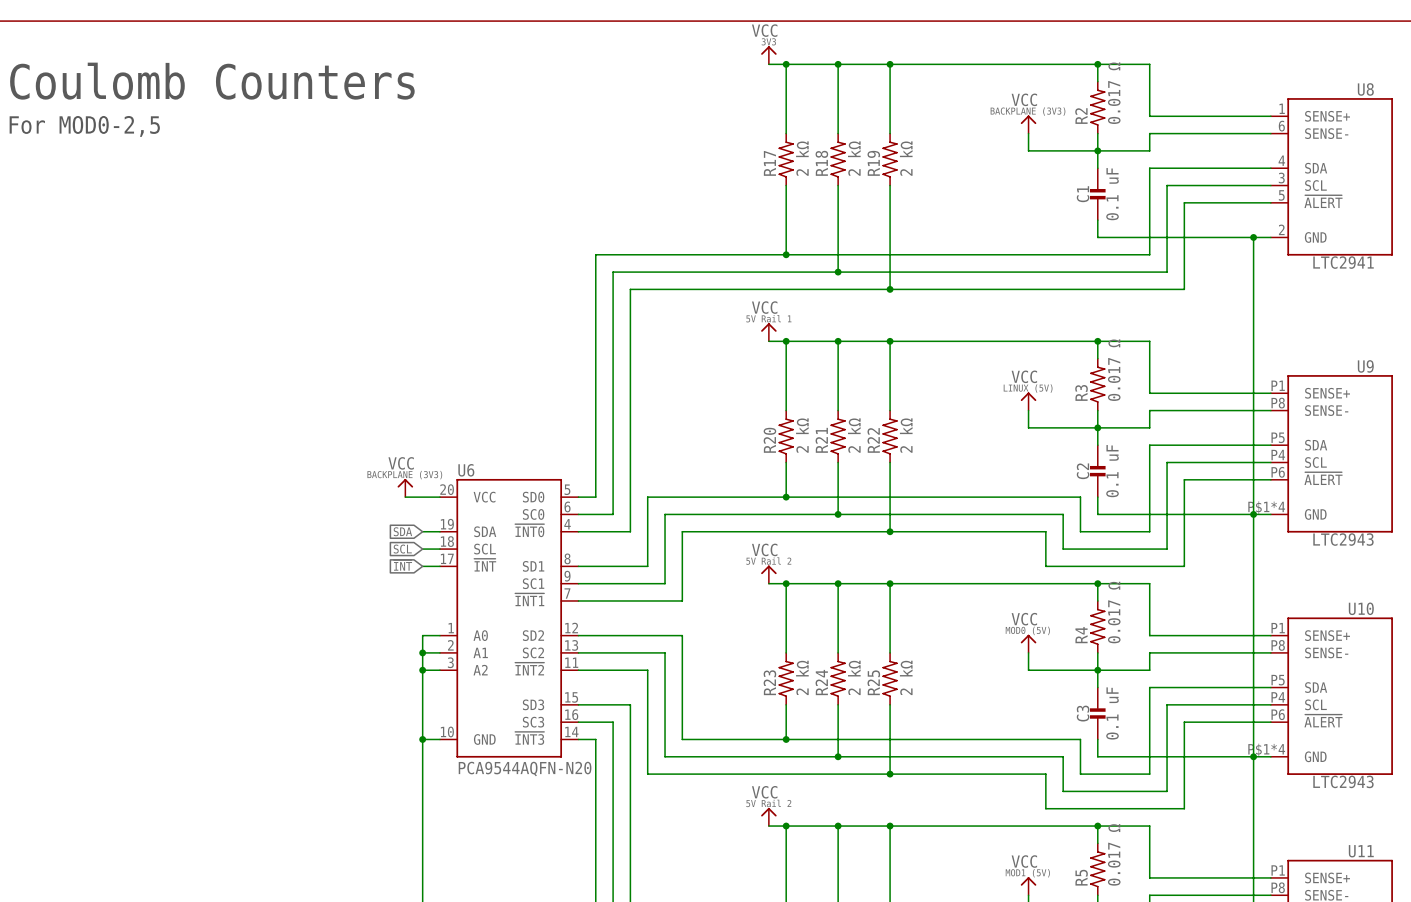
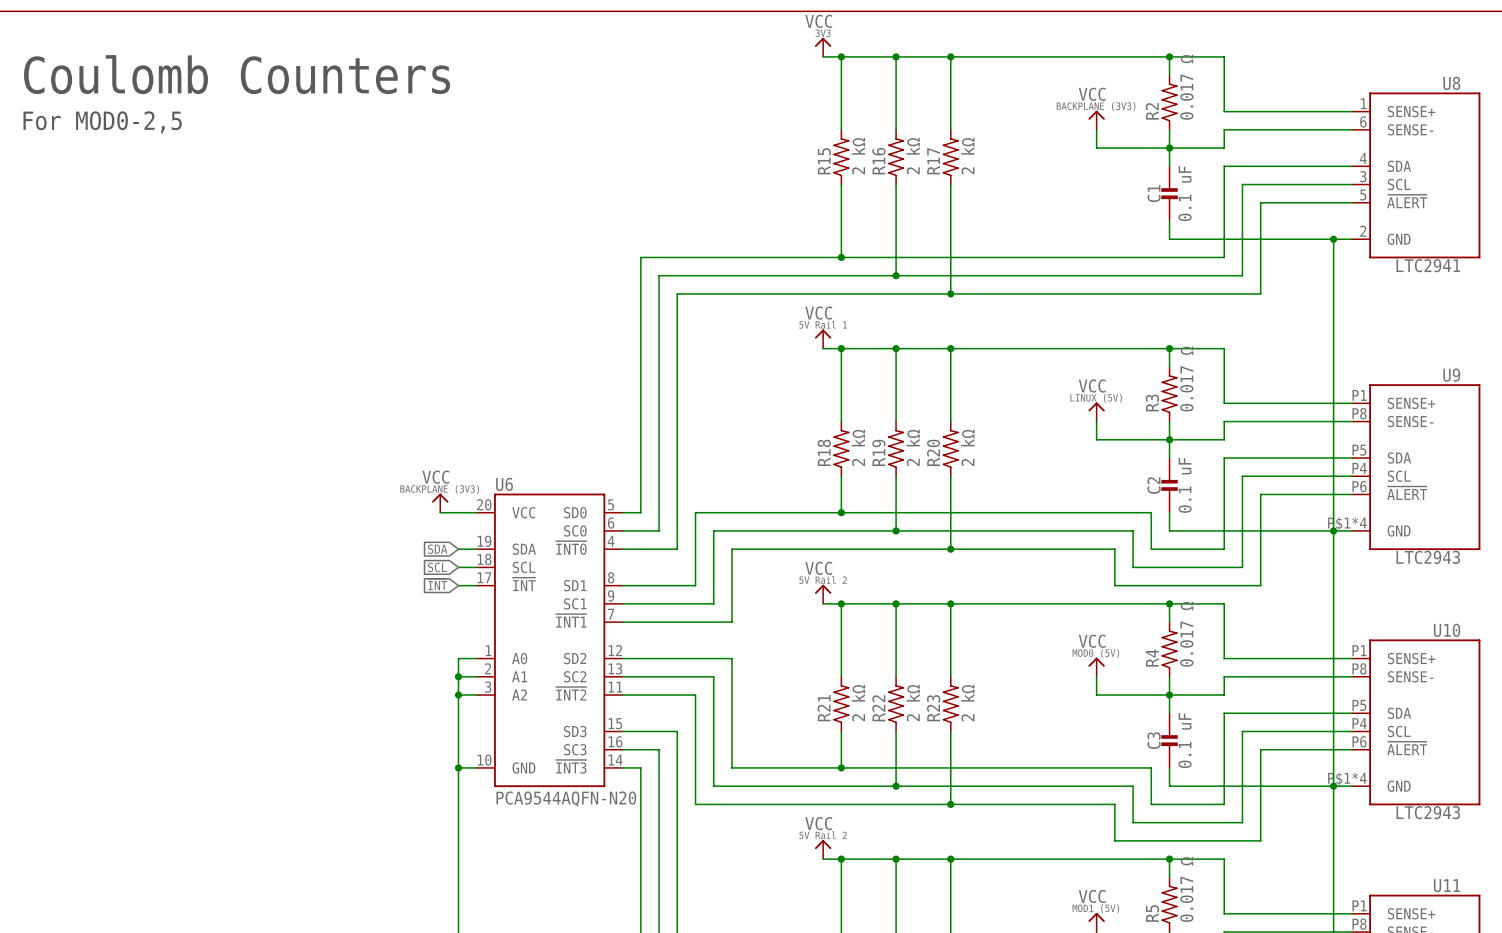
R17 name: R17 (769, 163) -> R15 (824, 161)
R18 name: R18 (821, 163) -> R16 (878, 161)
R19 name: R19 (873, 163) -> R17 (933, 161)
R20 name: R20 (769, 440) -> R18 (824, 452)
R21 name: R21 (821, 440) -> R19 (878, 452)
R22 name: R22 (873, 440) -> R20 (933, 452)
R23 name: R23 (769, 682) -> R21 (824, 708)
R24 name: R24 (821, 682) -> R22 (878, 708)
R25 name: R25 (873, 682) -> R23 (933, 708)

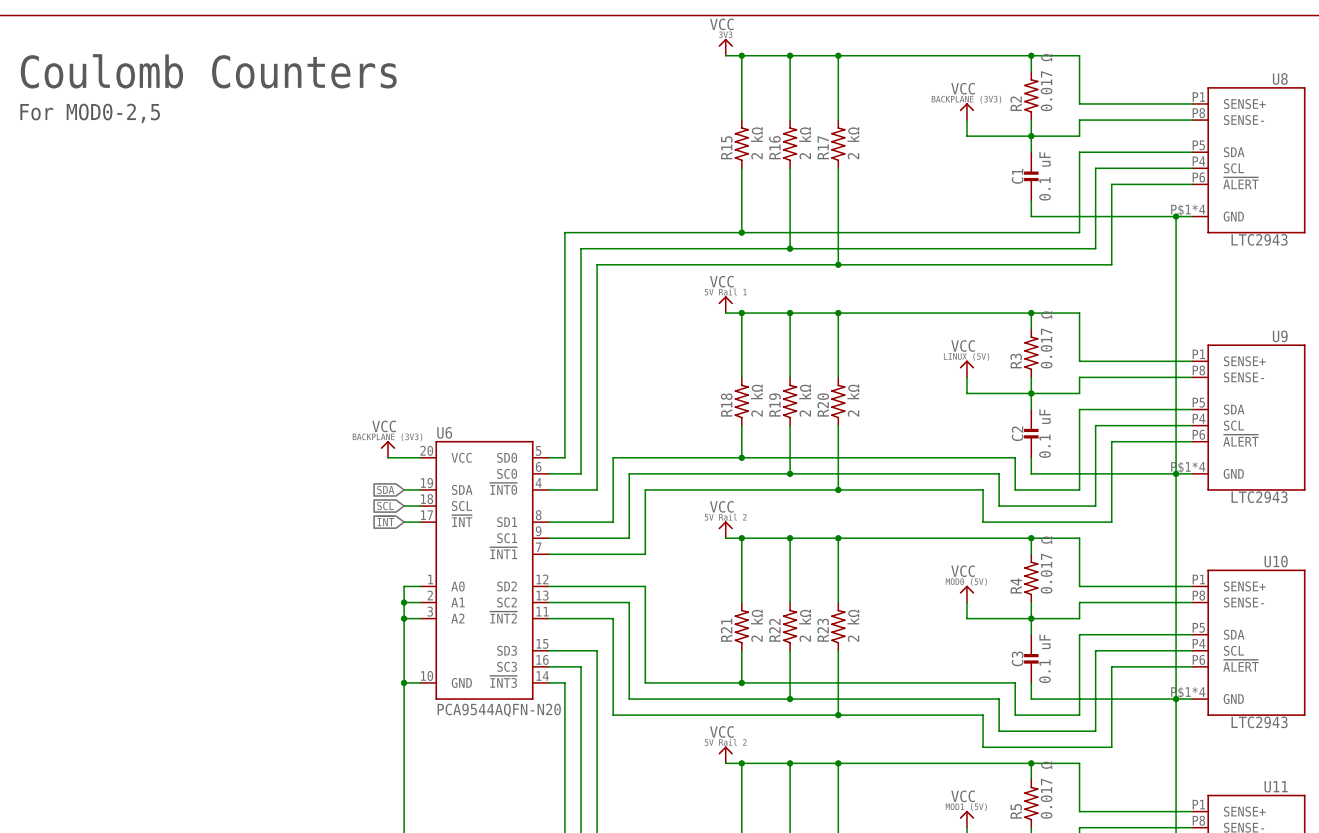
U8 pin number: 1 (1363, 103) -> P1 (1198, 97)
U8 pin number: 6 (1363, 121) -> P8 (1198, 113)
U8 pin number: 4 (1363, 158) -> P5 (1198, 145)
U8 pin number: 3 (1363, 176) -> P4 (1198, 161)
U8 pin number: 5 (1363, 194) -> P6 (1198, 177)
U8 pin number: 2 (1363, 231) -> P$1*4 (1188, 210)
U8 value: LTC2941 (1428, 265) -> LTC2943 (1259, 239)

